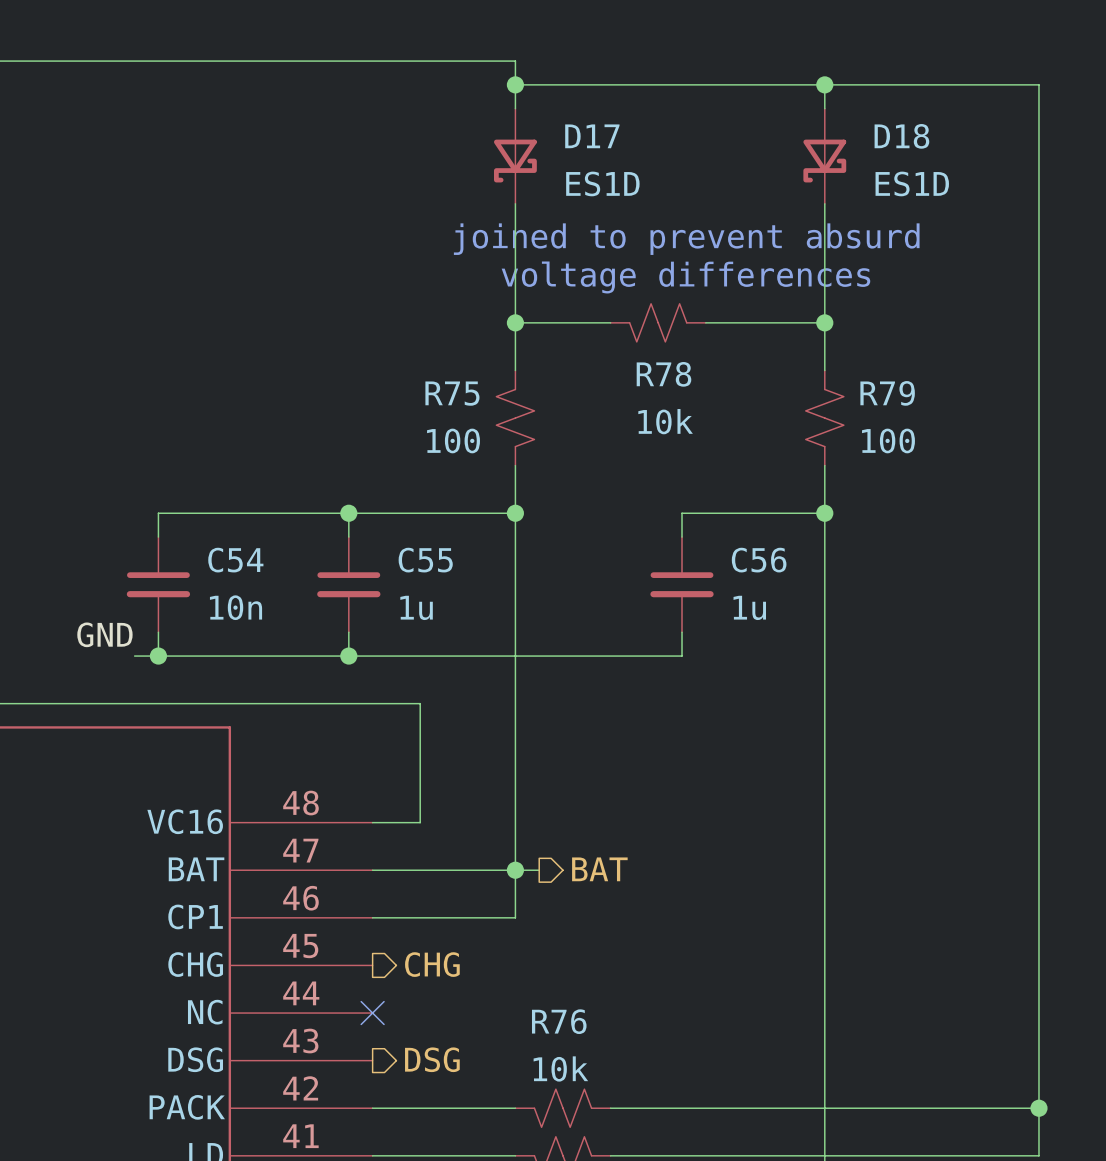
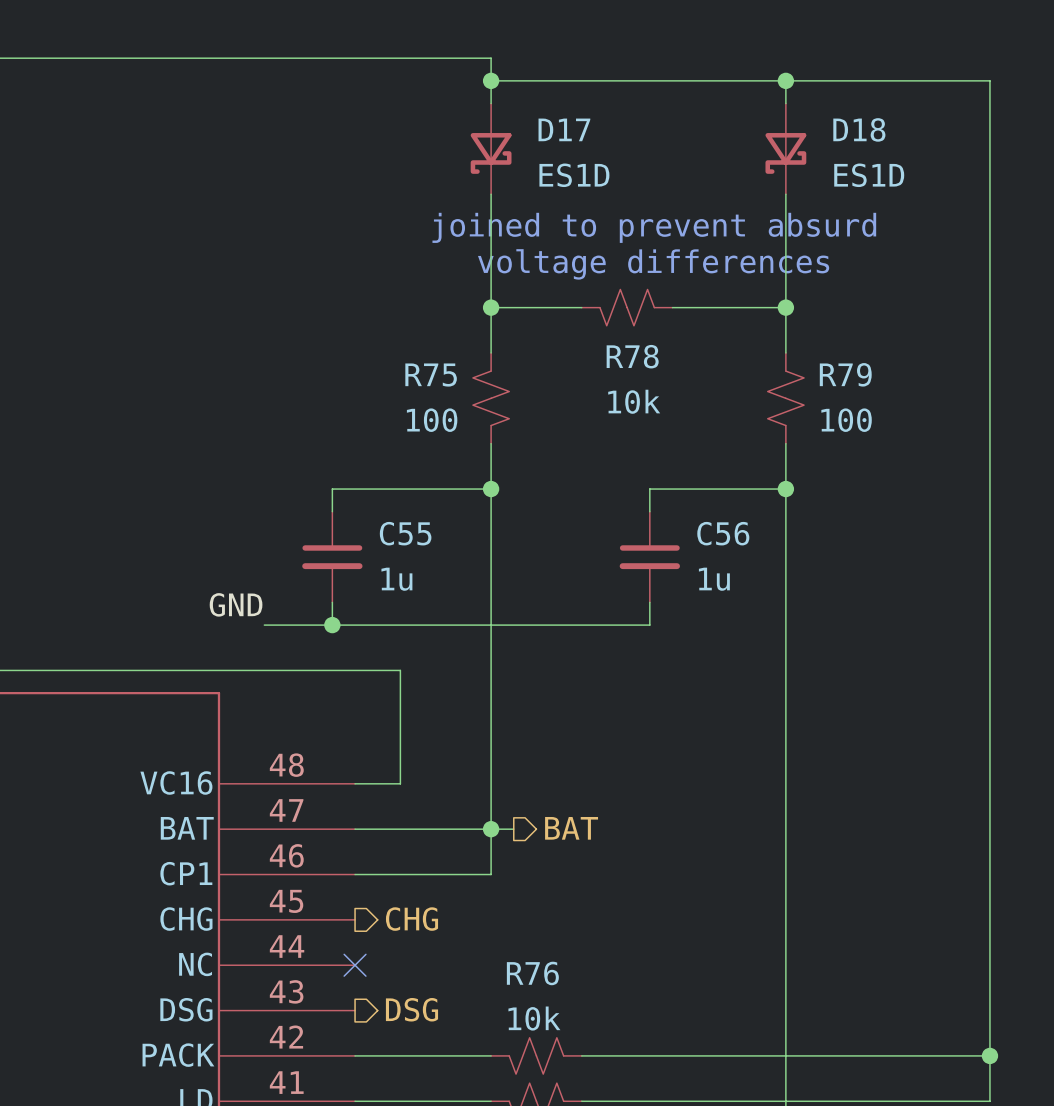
wire: (348, 513) (158, 513) (158, 537) -> none
junction: (348, 513) -> none
C54: 10n (158, 584) -> none
wire: (158, 632) (158, 656) -> none
label position: GND (104, 634) -> GND (236, 604)
wire: (134, 656) (277, 656) -> none
junction: (158, 656) -> none

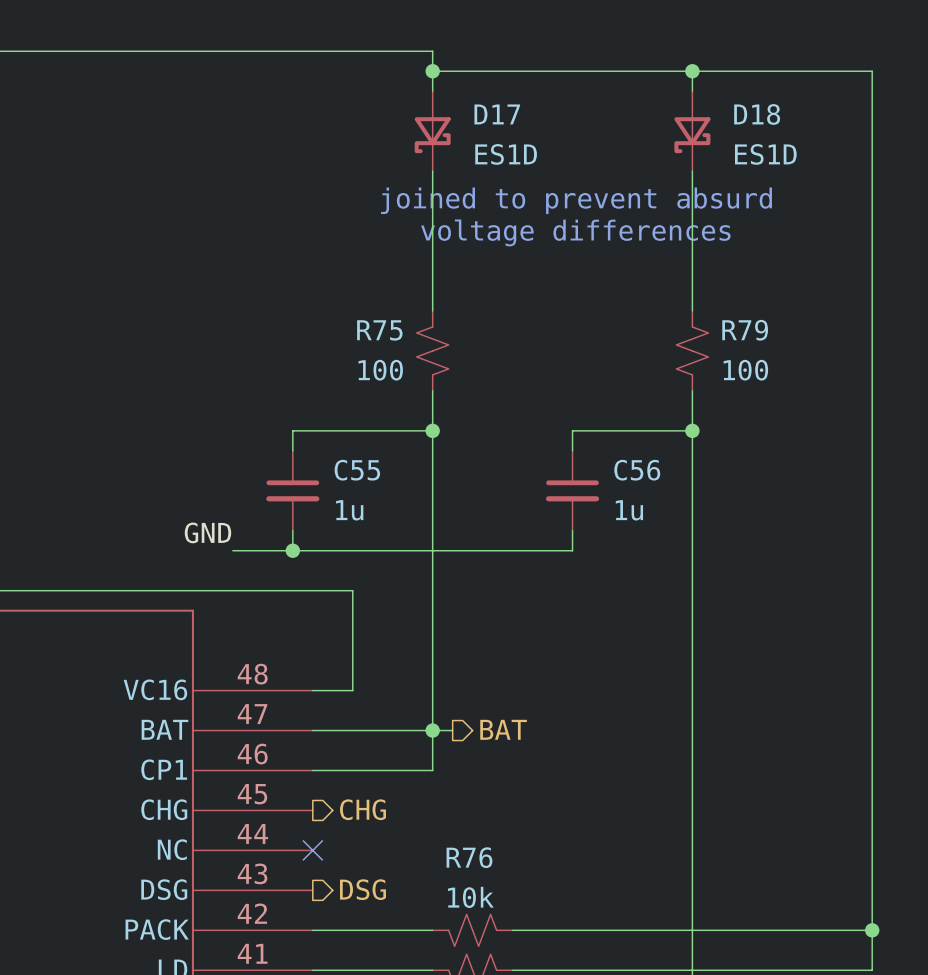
wire: (491, 307) (581, 307) -> none
junction: (491, 307) -> none
R78: 10k (627, 307) -> none
wire: (672, 307) (785, 307) -> none
junction: (785, 307) -> none

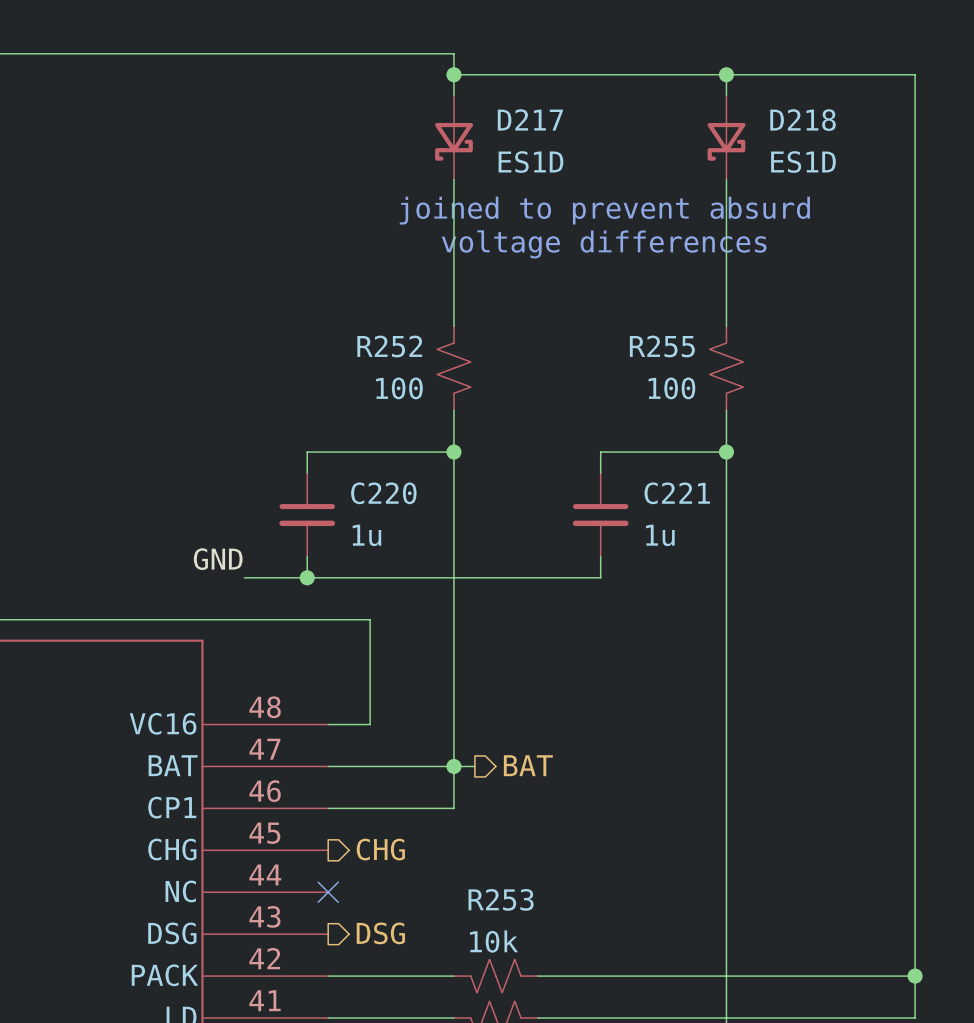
D17 name: D17 (497, 114) -> D217 (530, 119)
D18 name: D18 (757, 114) -> D218 (803, 120)
R75 name: R75 (379, 330) -> R252 (389, 346)
R79: 100 (692, 350) -> none
R255: none -> 100 (726, 368)
C55 name: C55 (357, 470) -> C220 (383, 493)
C56 name: C56 (637, 470) -> C221 (677, 493)
R76 name: R76 (469, 857) -> R253 (501, 899)

